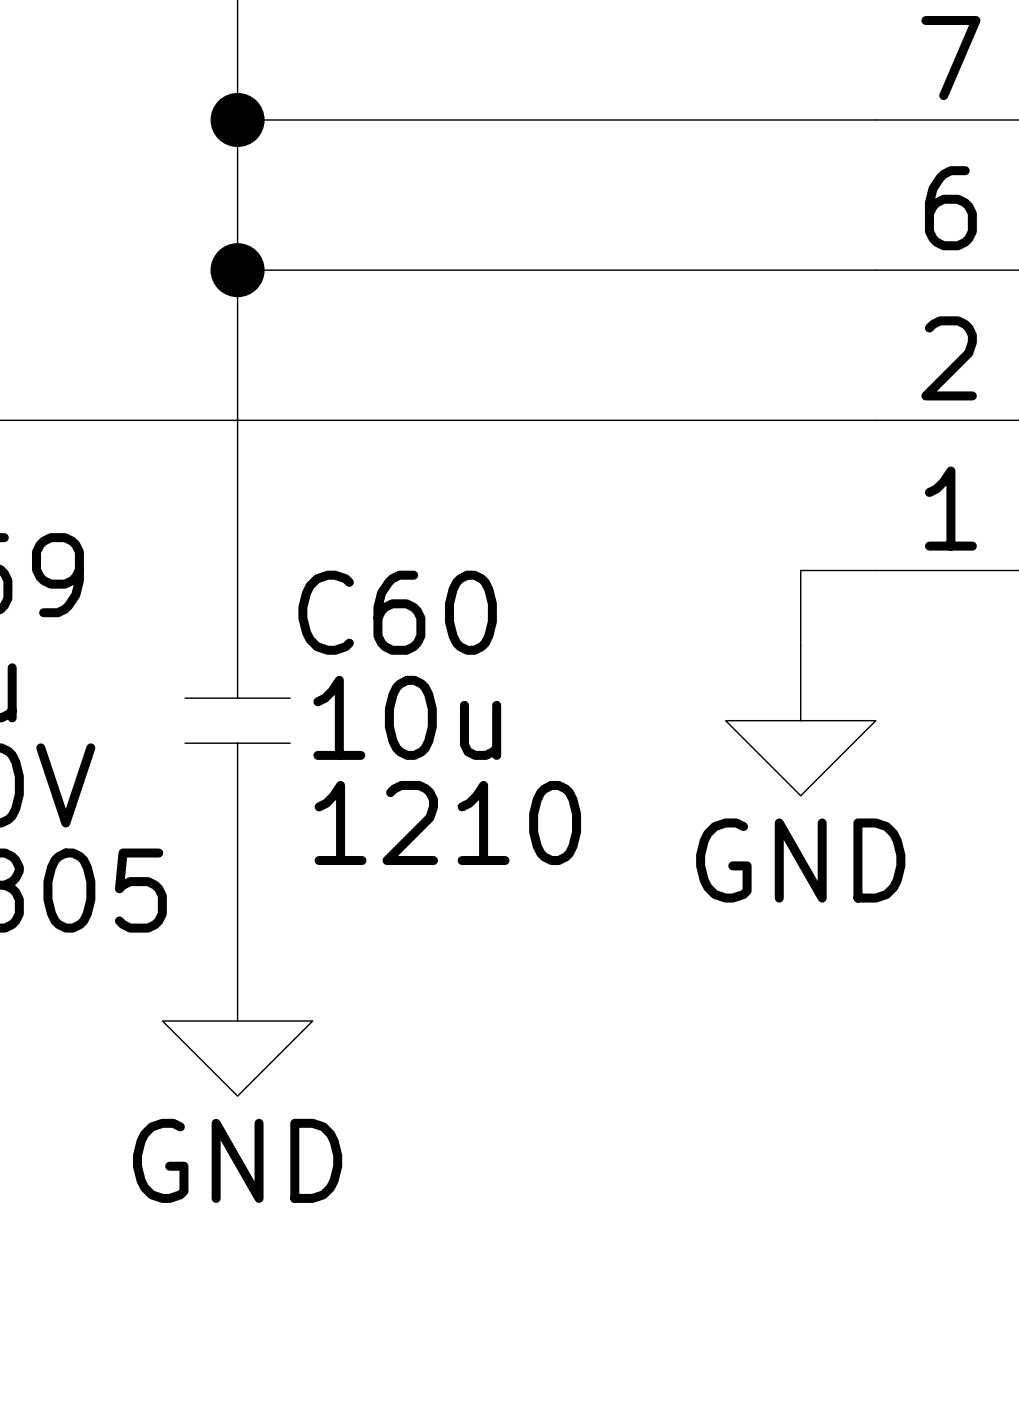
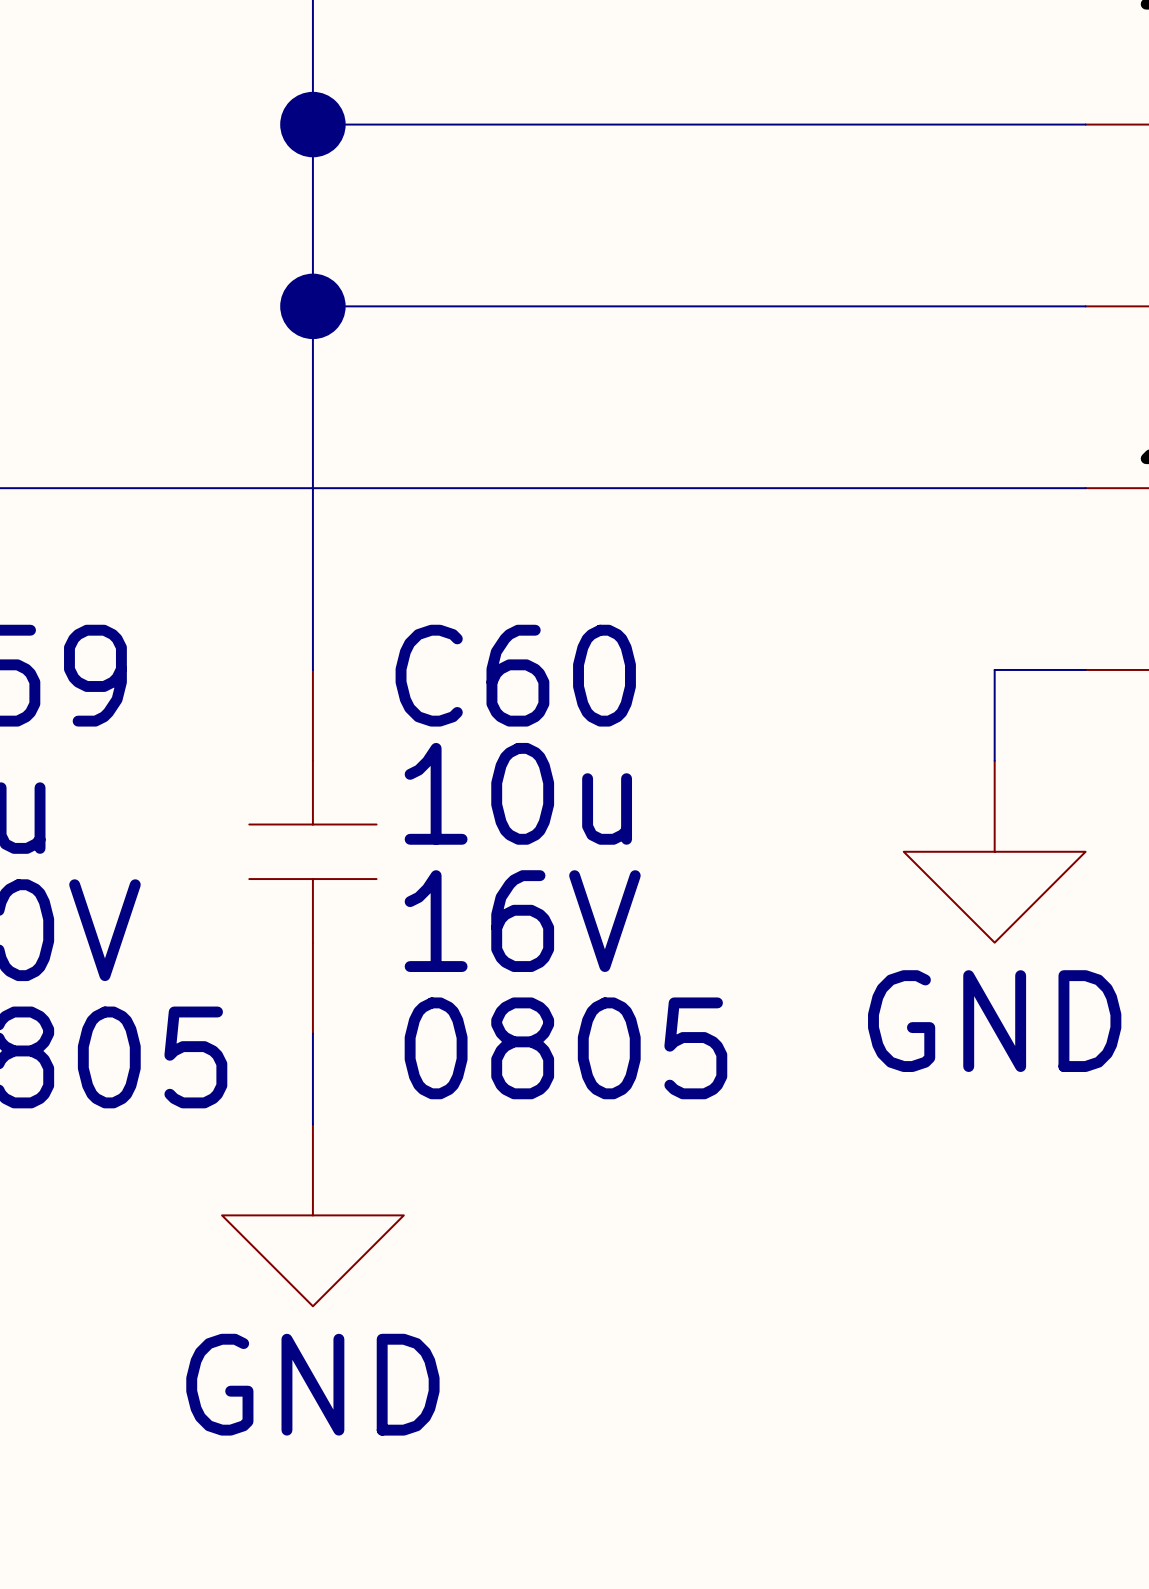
C60 name position: C60 (397, 612) -> C60 (515, 675)
C60 value position: 10u (407, 717) -> 10u (518, 793)
C60 text: none -> 16V (522, 921)
C60 text: 1210 (447, 822) -> 0805 (565, 1048)

